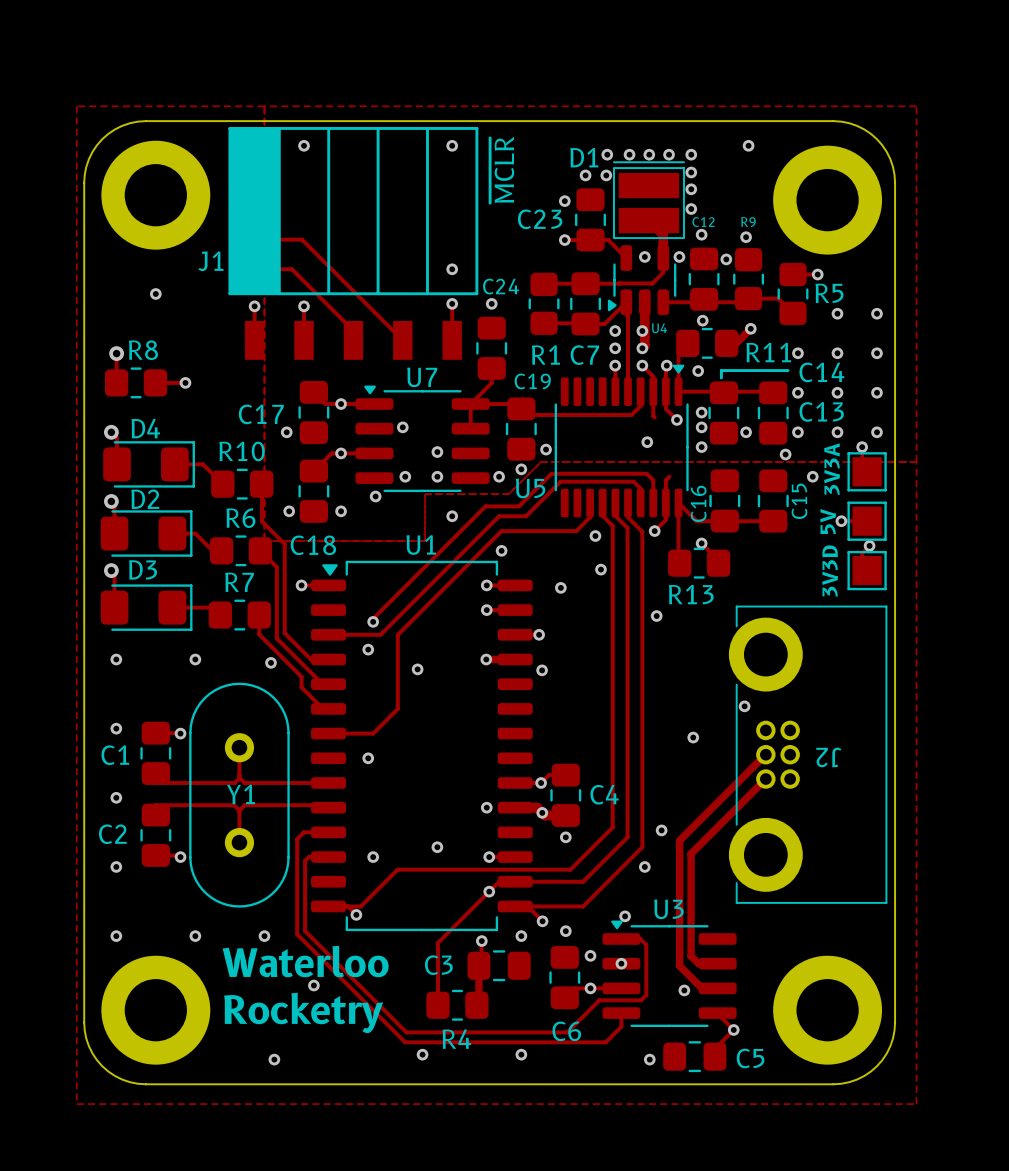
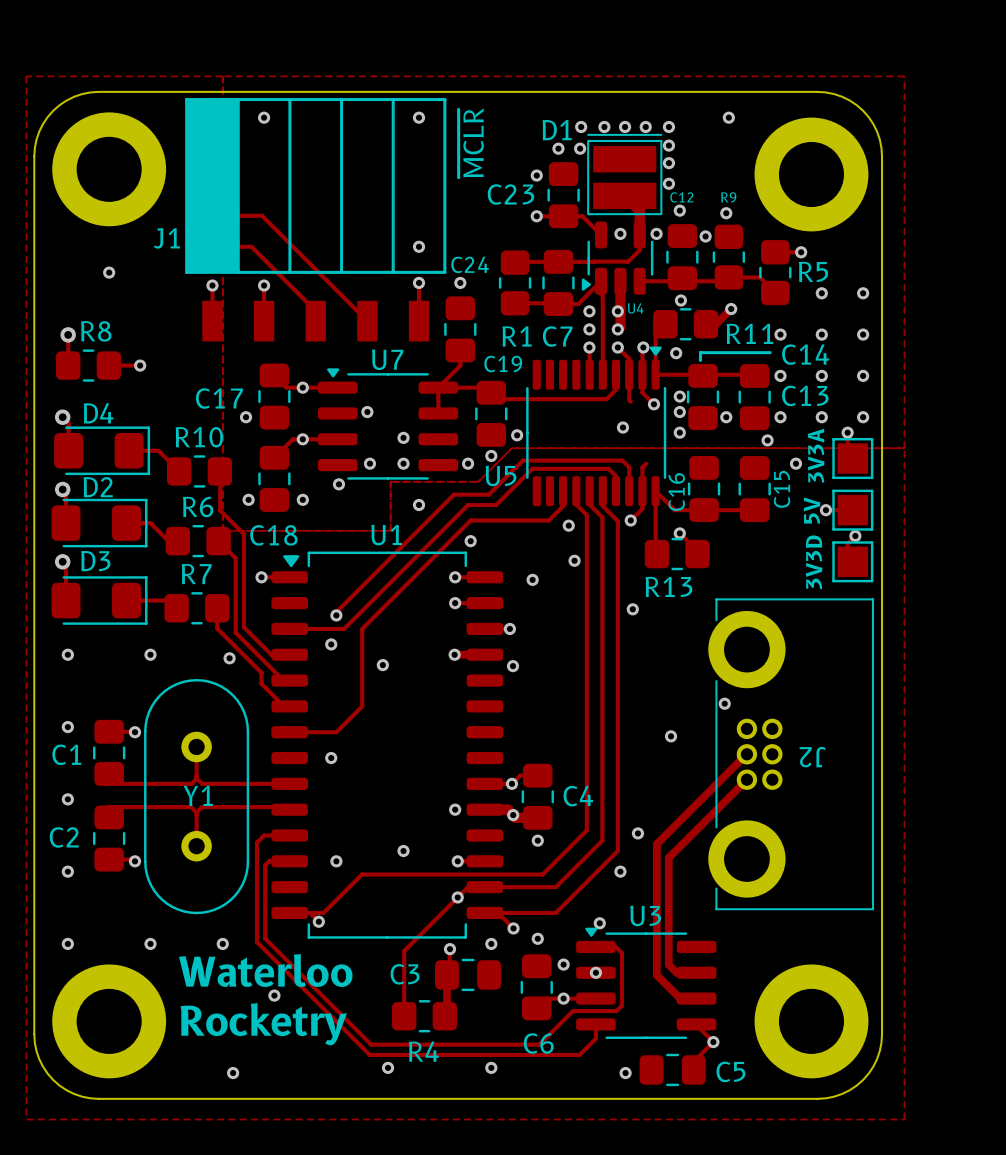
via: (684, 990) -> none

